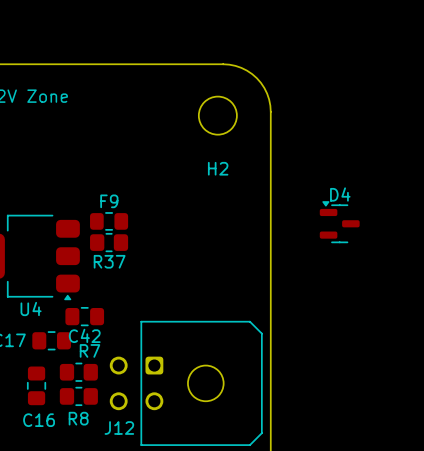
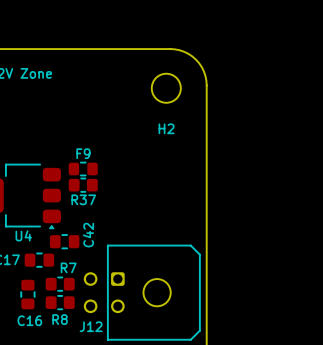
D4: (339, 222) -> none
C42 name rotation: 0° (84, 335) -> 90° counterclockwise (88, 235)
C42 name position: C42 (84, 335) -> C42 (88, 235)

